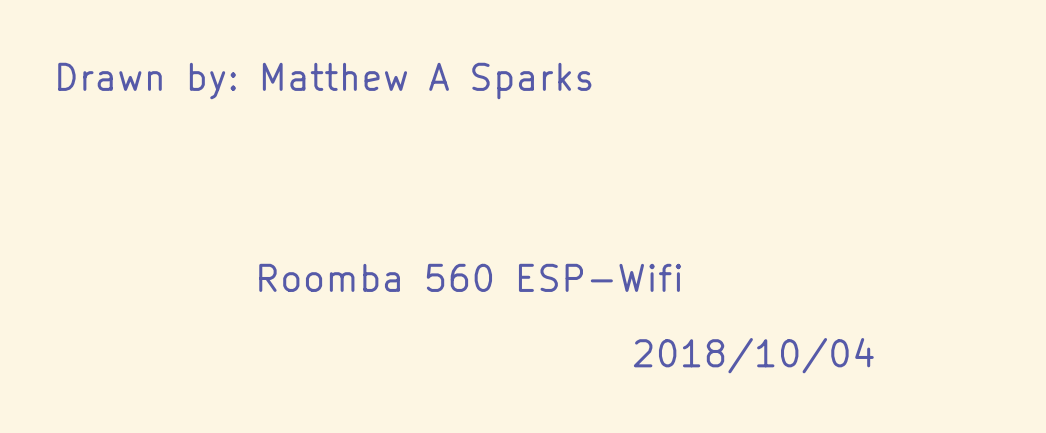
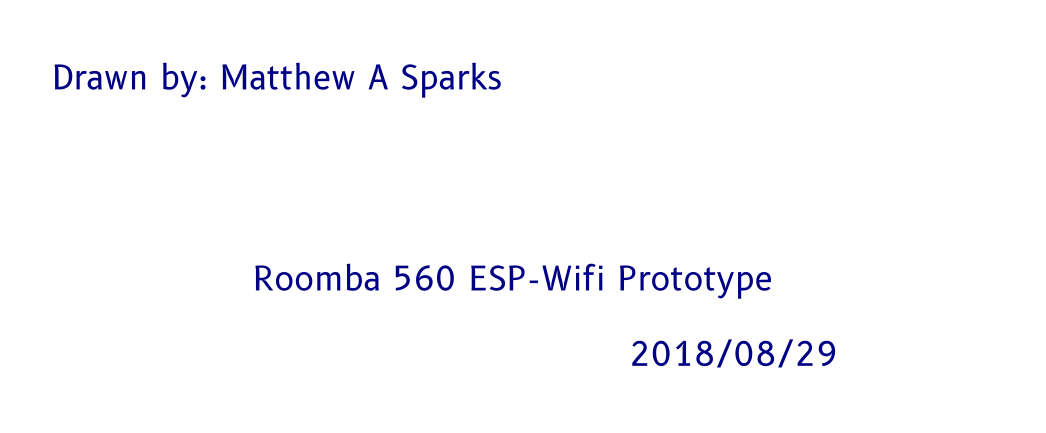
text: Roomba 560 ESP-Wifi (470, 277) -> Roomba 560 ESP-Wifi Prototype (513, 281)
text: 2018/10/04 (753, 355) -> 2018/08/29 (733, 353)

